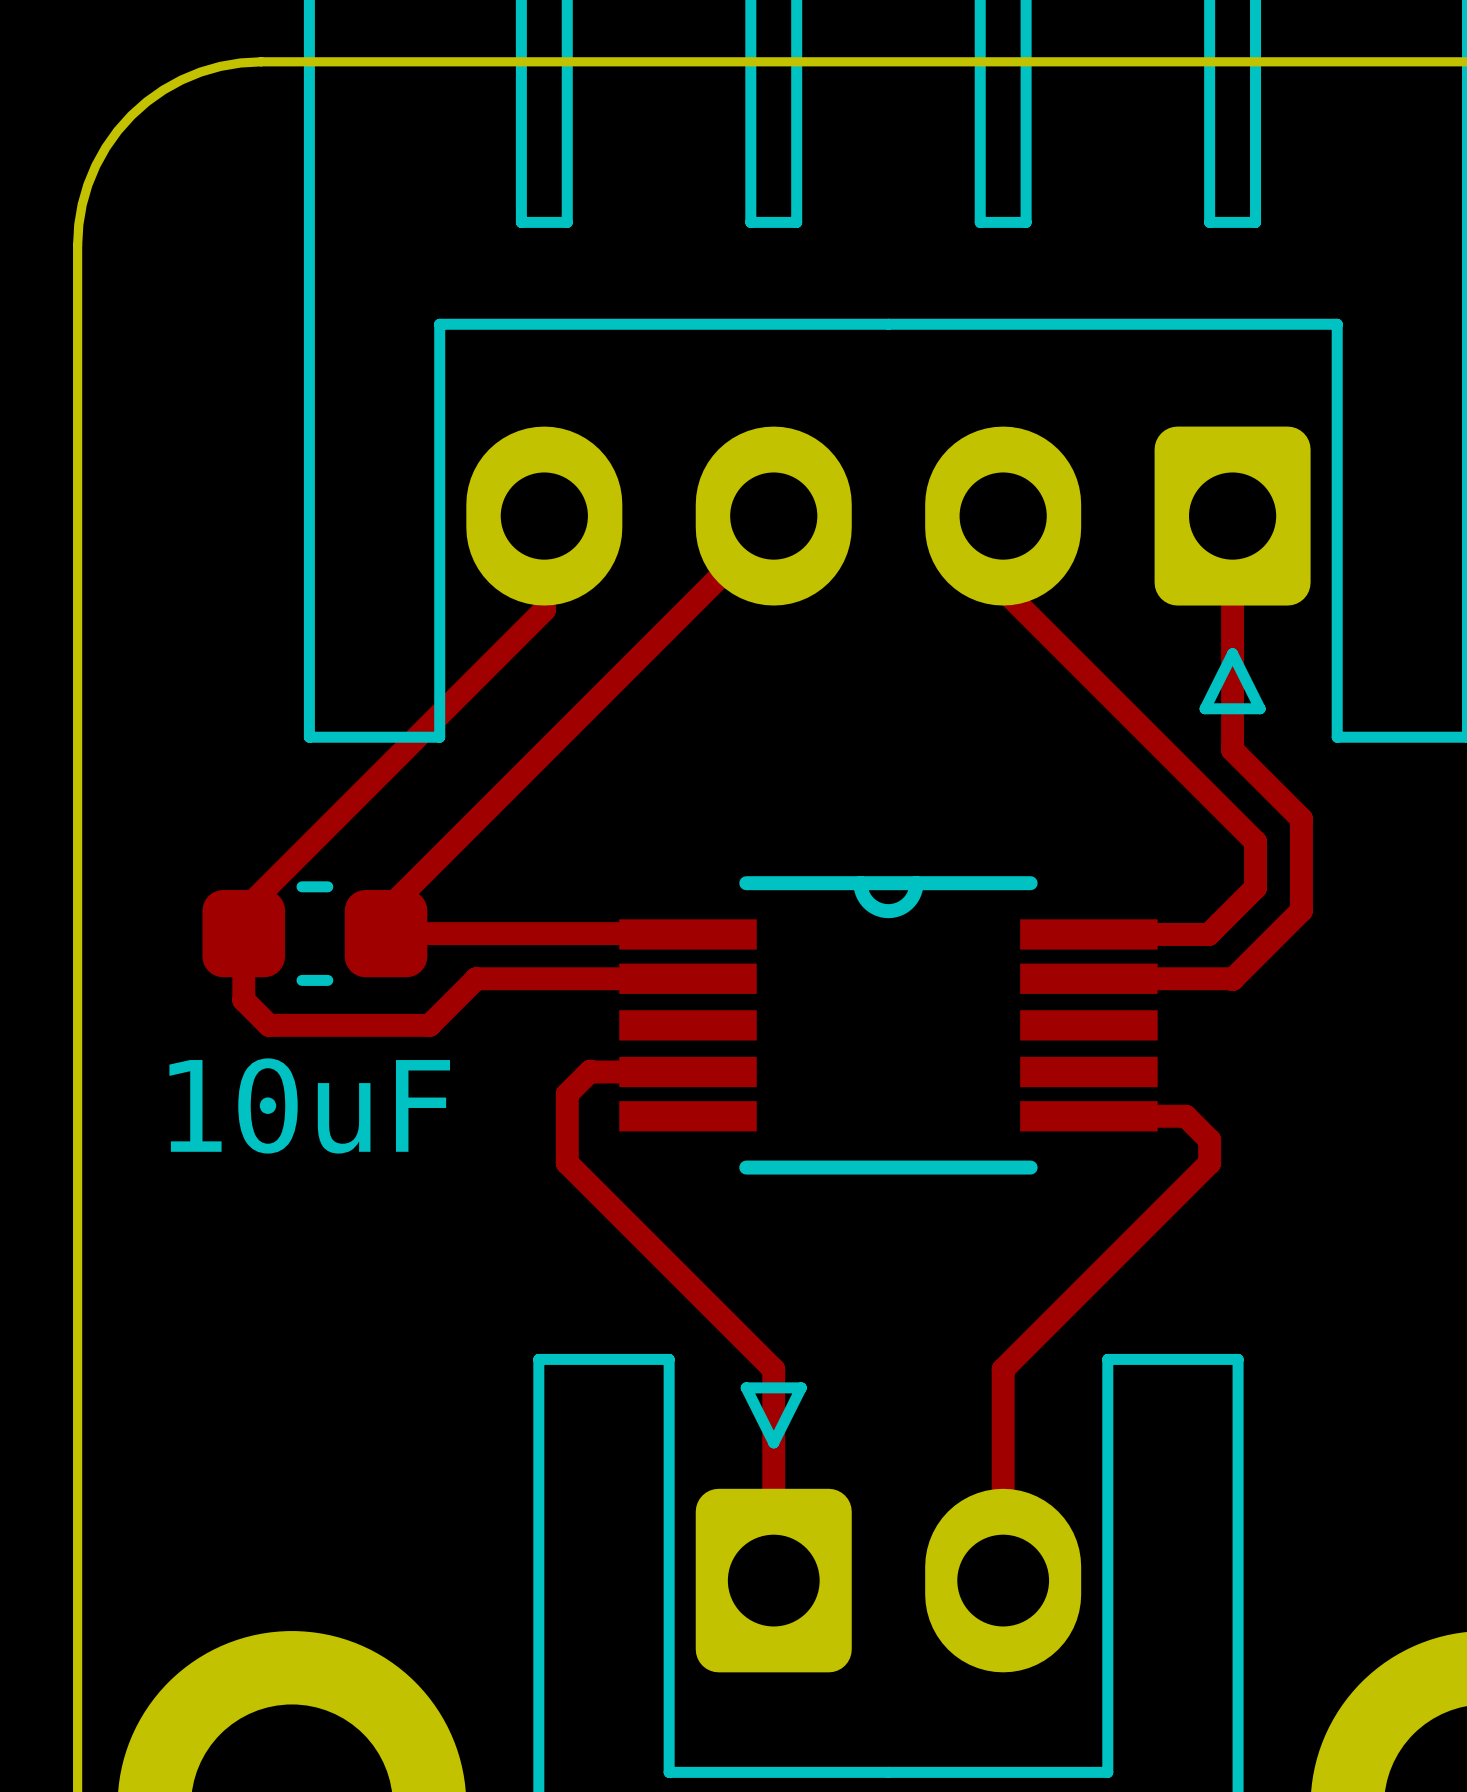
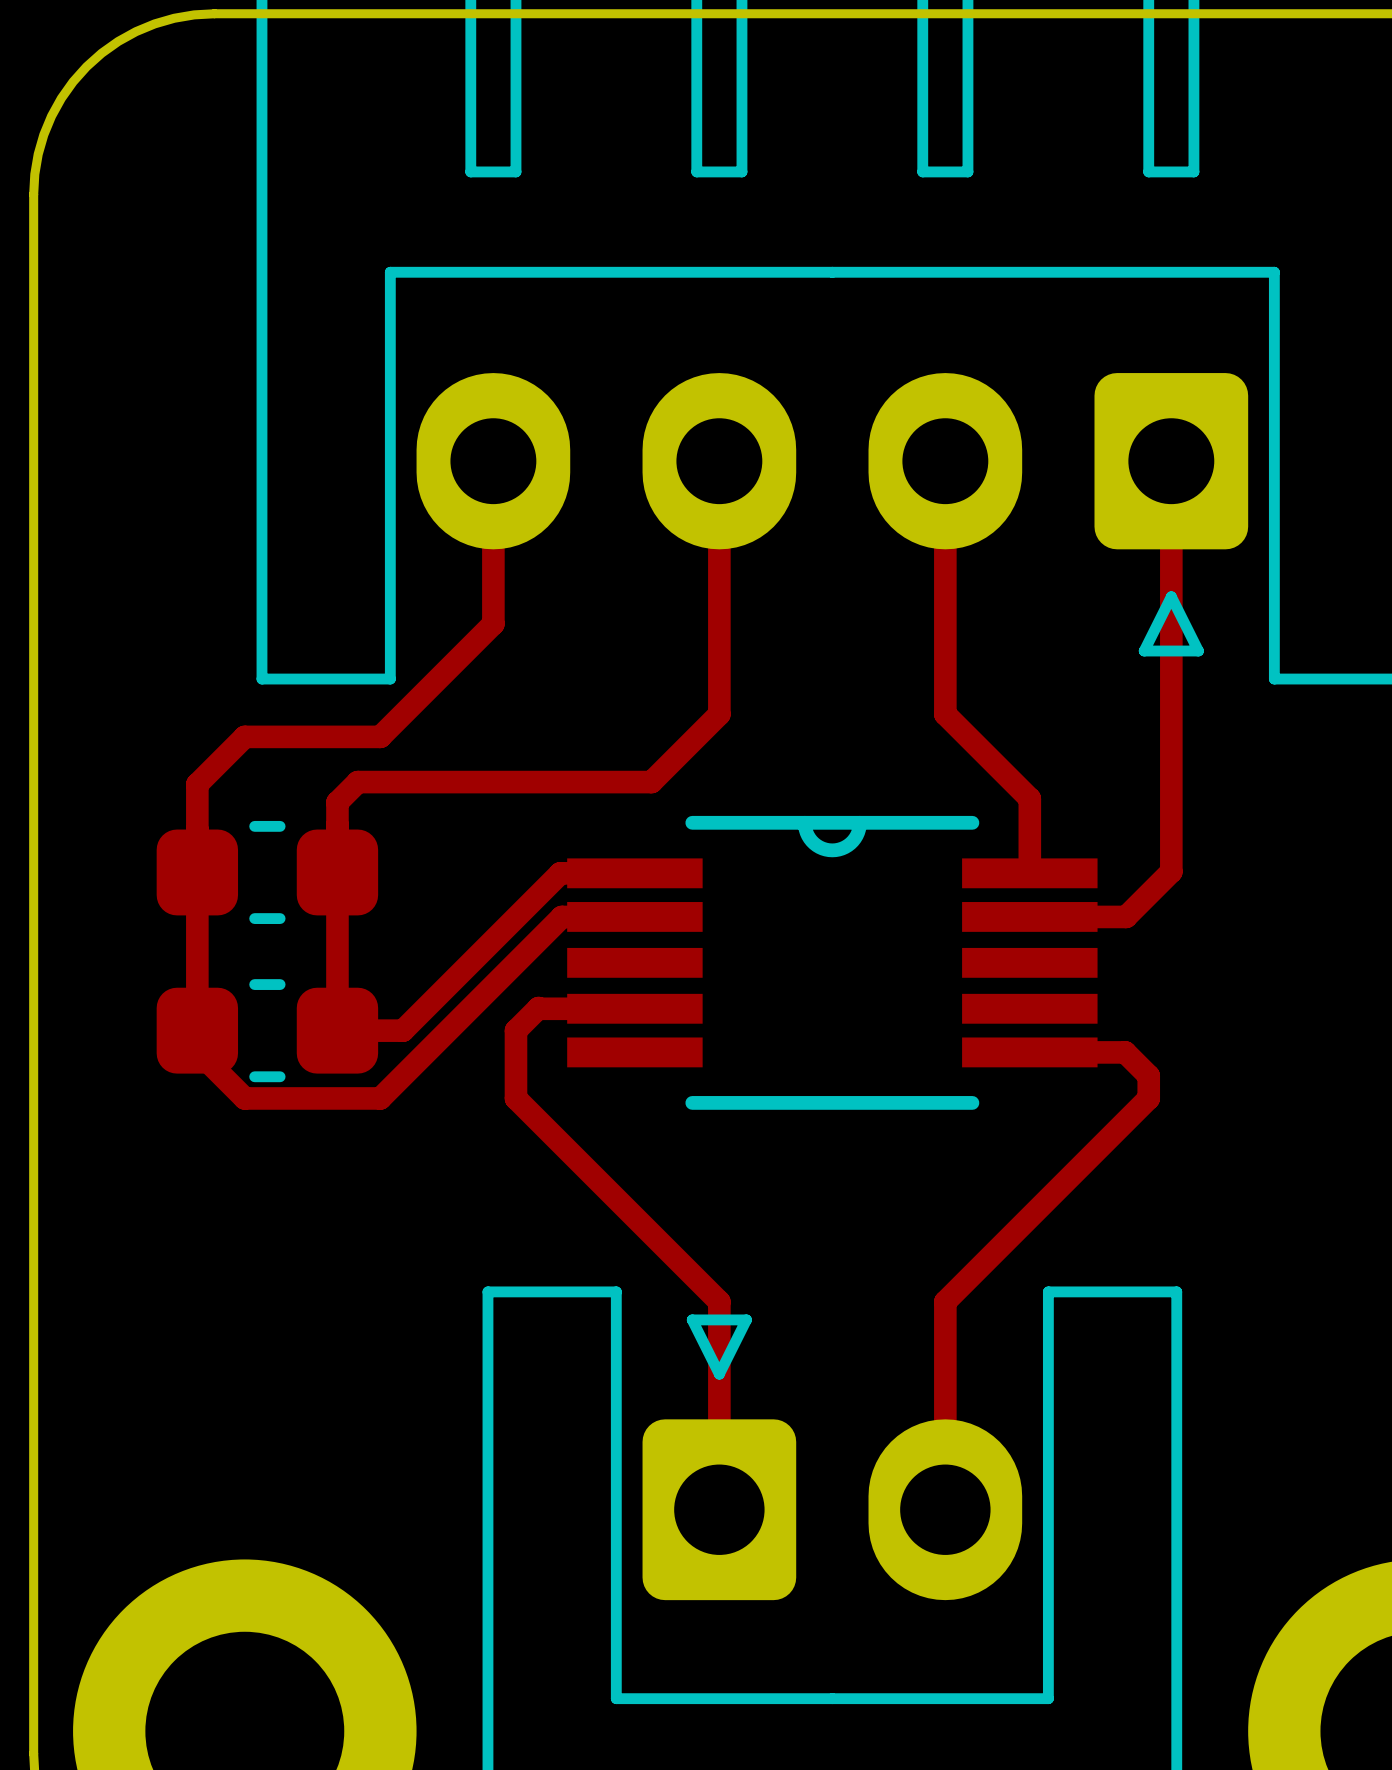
track: (773, 522) (386, 910) -> (719, 467) (719, 714) (651, 782) (357, 782) (337, 802) (337, 1030) (402, 1030) (560, 873) (634, 873)
track: (1003, 589) (1255, 841) (1255, 887) (1208, 934) (1088, 934) -> (945, 533) (945, 714) (1029, 798) (1029, 873)
track: (544, 610) (243, 910) -> (493, 553) (493, 623) (380, 736) (244, 736) (197, 784) (197, 872)
track: (1232, 750) (1301, 818) (1301, 910) (1232, 979) -> (1171, 691) (1171, 871) (1126, 916)
track: (386, 933) (687, 933) -> none
track: (613, 978) (476, 978) (429, 1025) (269, 1025) (243, 1000) -> (561, 916) (380, 1098) (244, 1098) (197, 1050) (197, 938)
track: (1186, 978) (1231, 978) -> none
part: none -> (267, 1030)
text: 10uF (309, 1105) -> none

